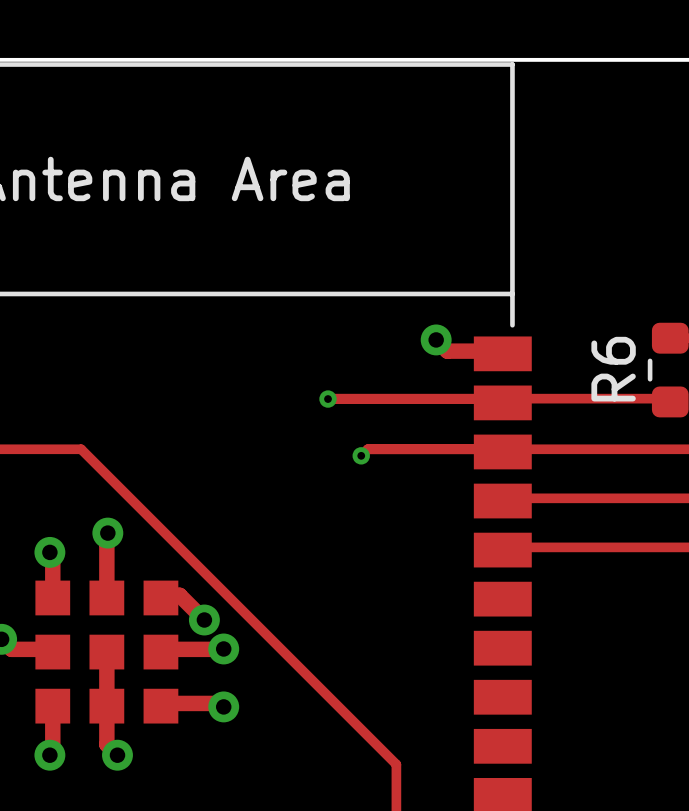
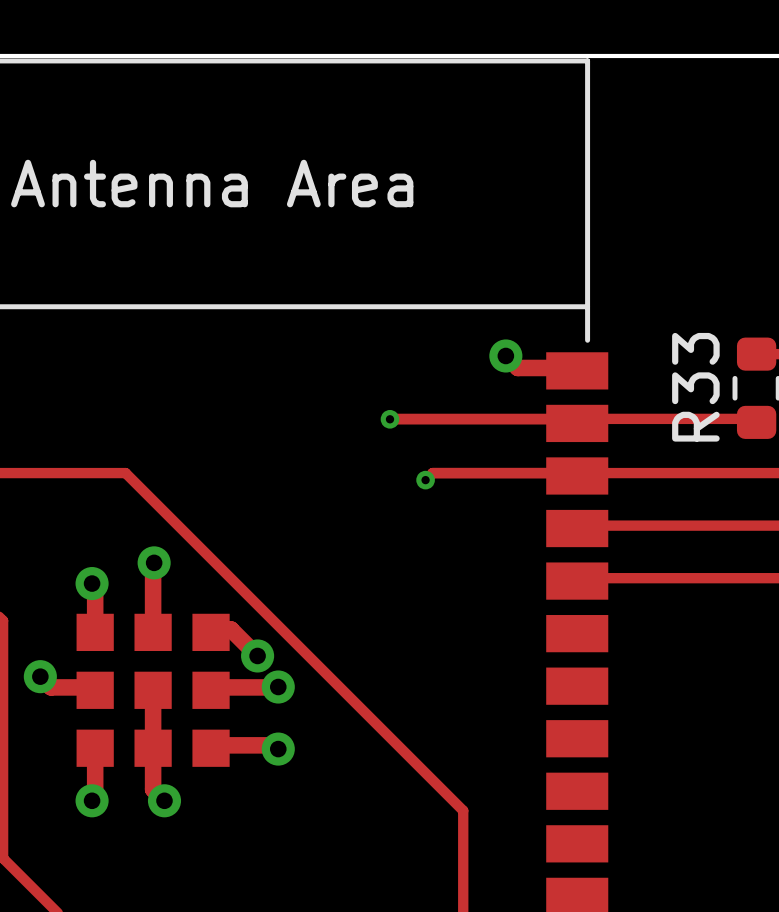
R6 name: R6 (613, 369) -> R33 (695, 387)

